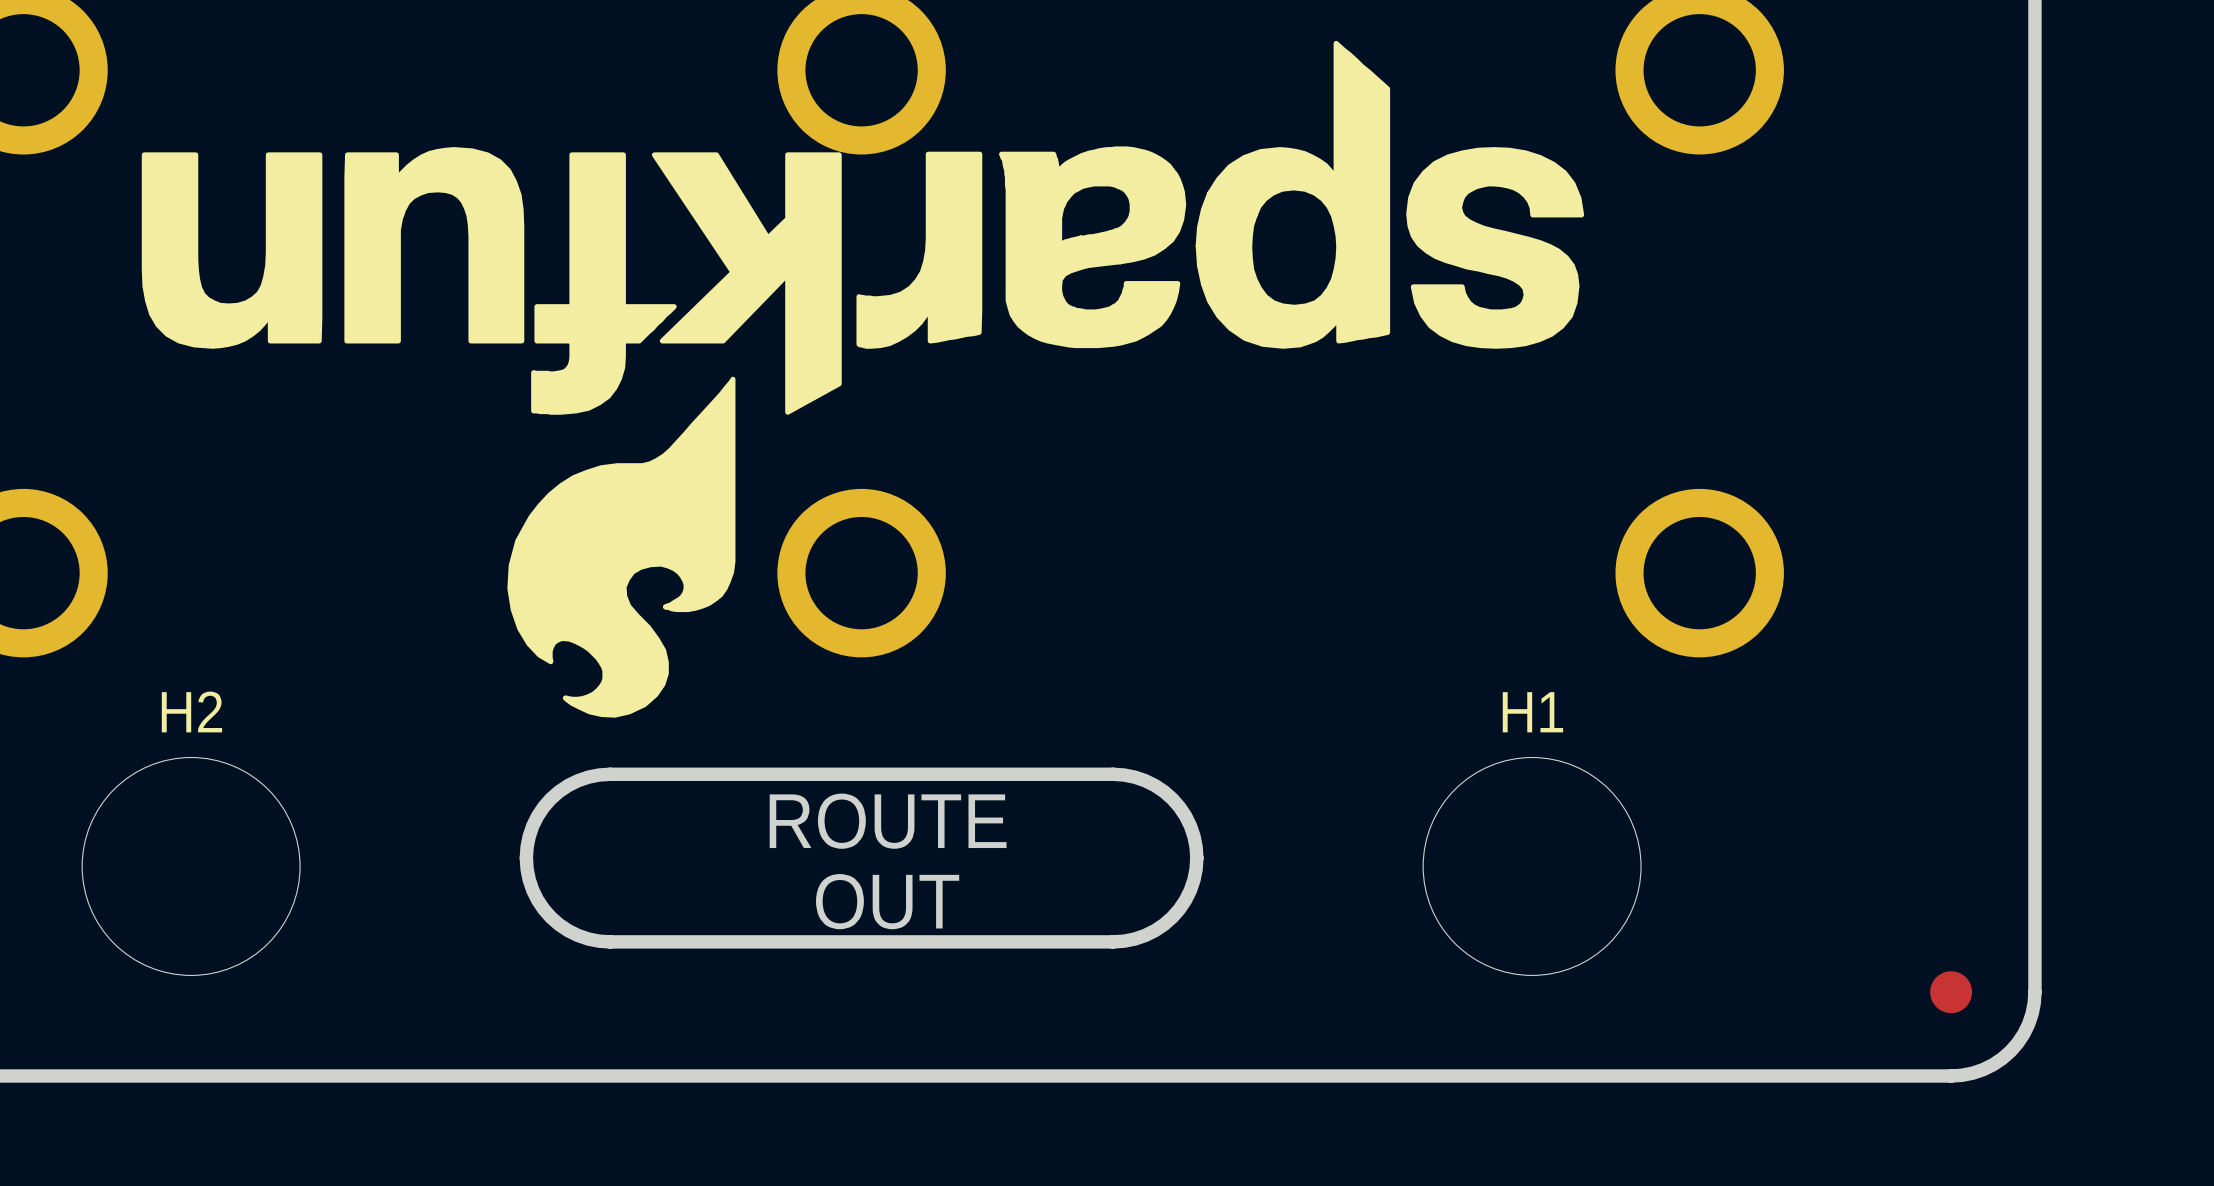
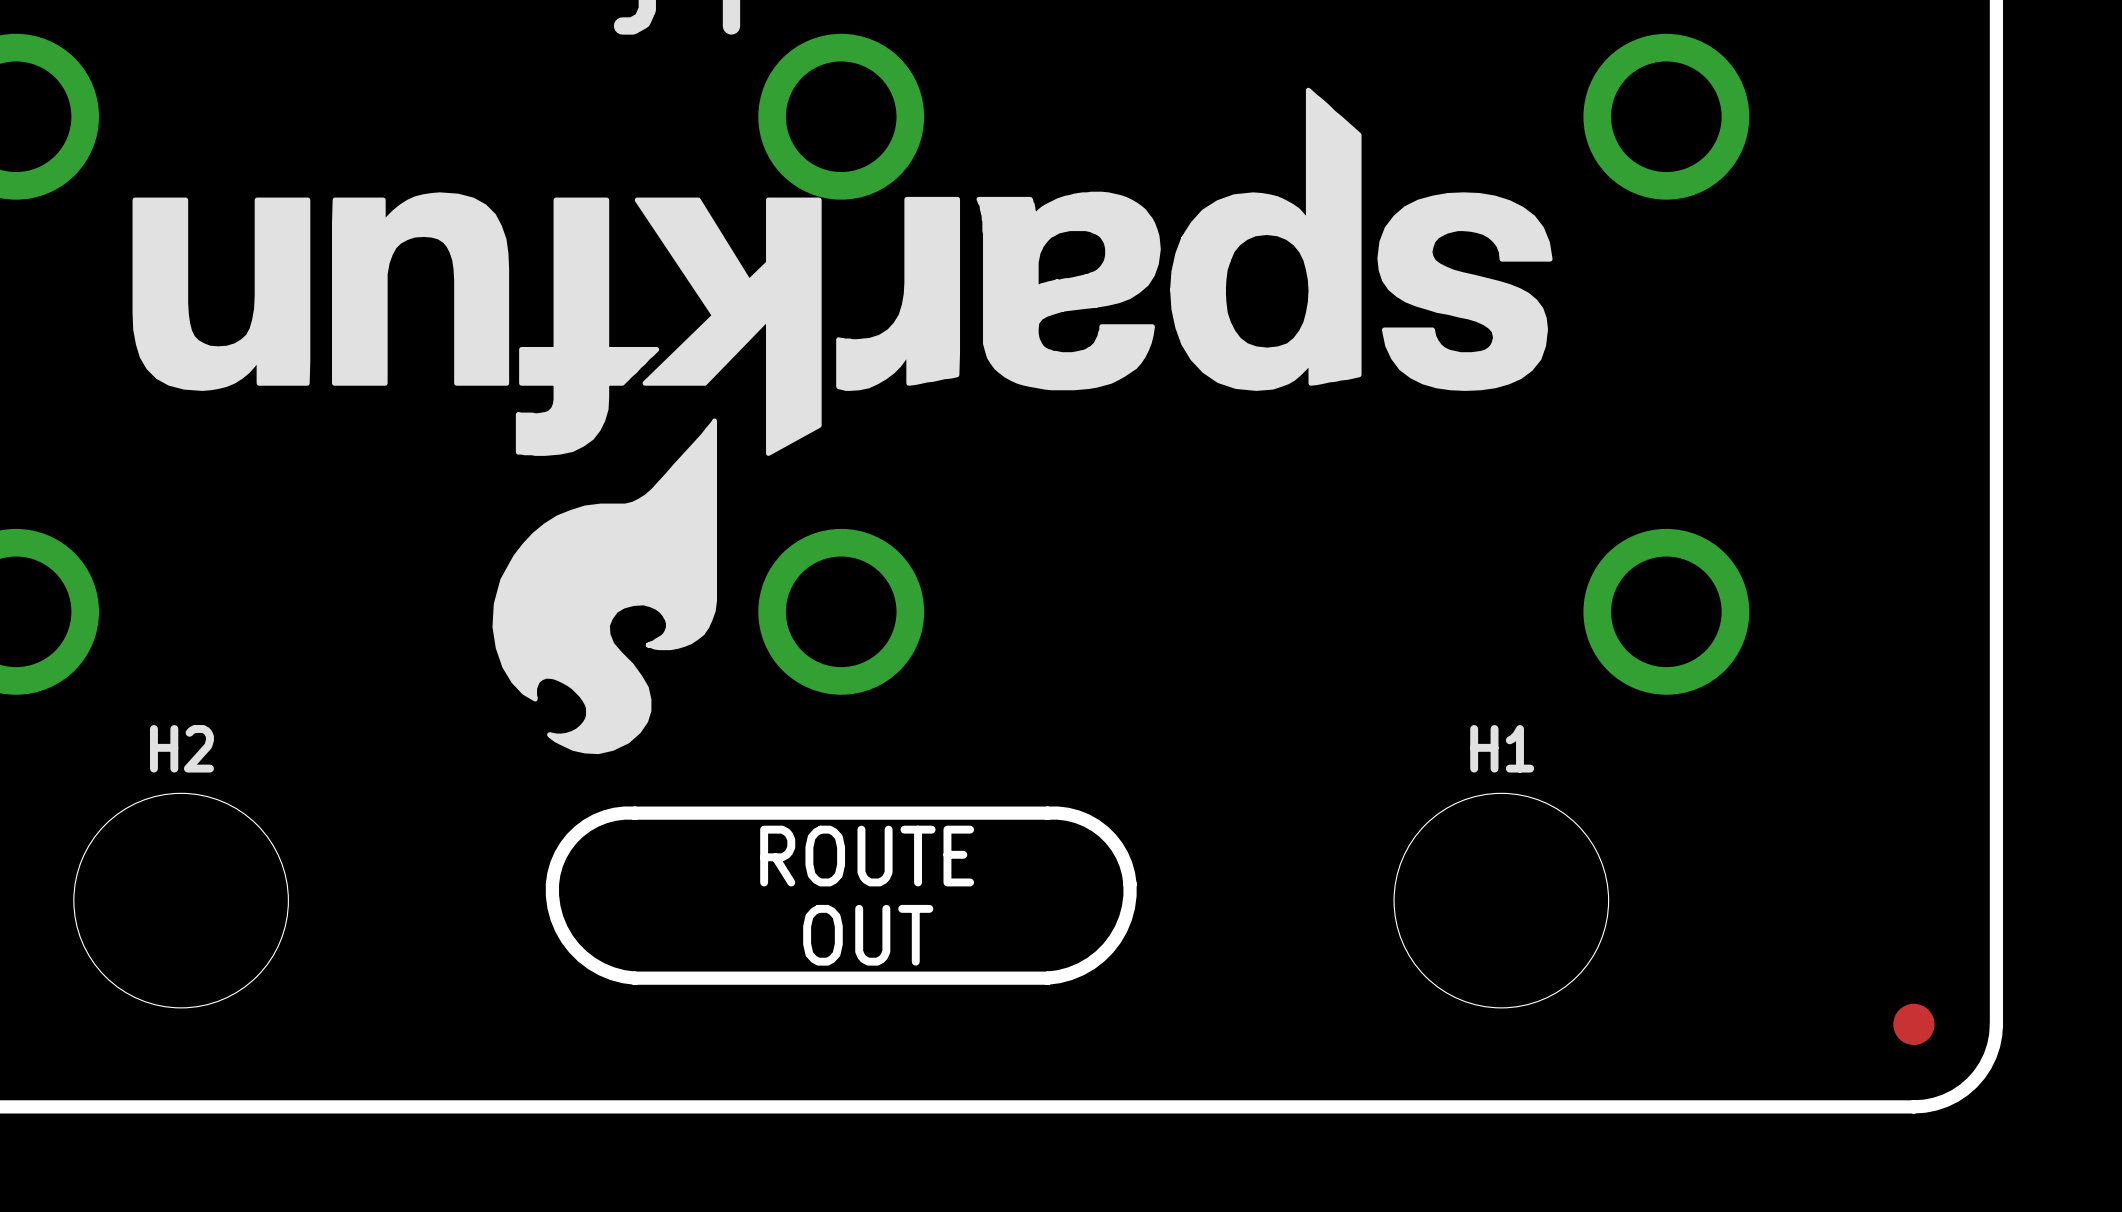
board edge: (610, 774) (1123, 775) (1154, 785) (1179, 807) (1193, 836) (1196, 869) (1185, 899) (1172, 917) (1154, 930) (1123, 941) (599, 941) (568, 930) (543, 909) (529, 879) (526, 858) (532, 826) (550, 798) (578, 780) (610, 774) -> (634, 813) (605, 816) (578, 831) (560, 855) (552, 884) (552, 895) (556, 918) (567, 939) (582, 956) (591, 963) (612, 973) (623, 976) (634, 978) (1058, 976) (1080, 969) (1100, 956) (1115, 939) (1121, 929) (1128, 907) (1128, 874) (1116, 846) (1095, 825) (1067, 814) (634, 813)

